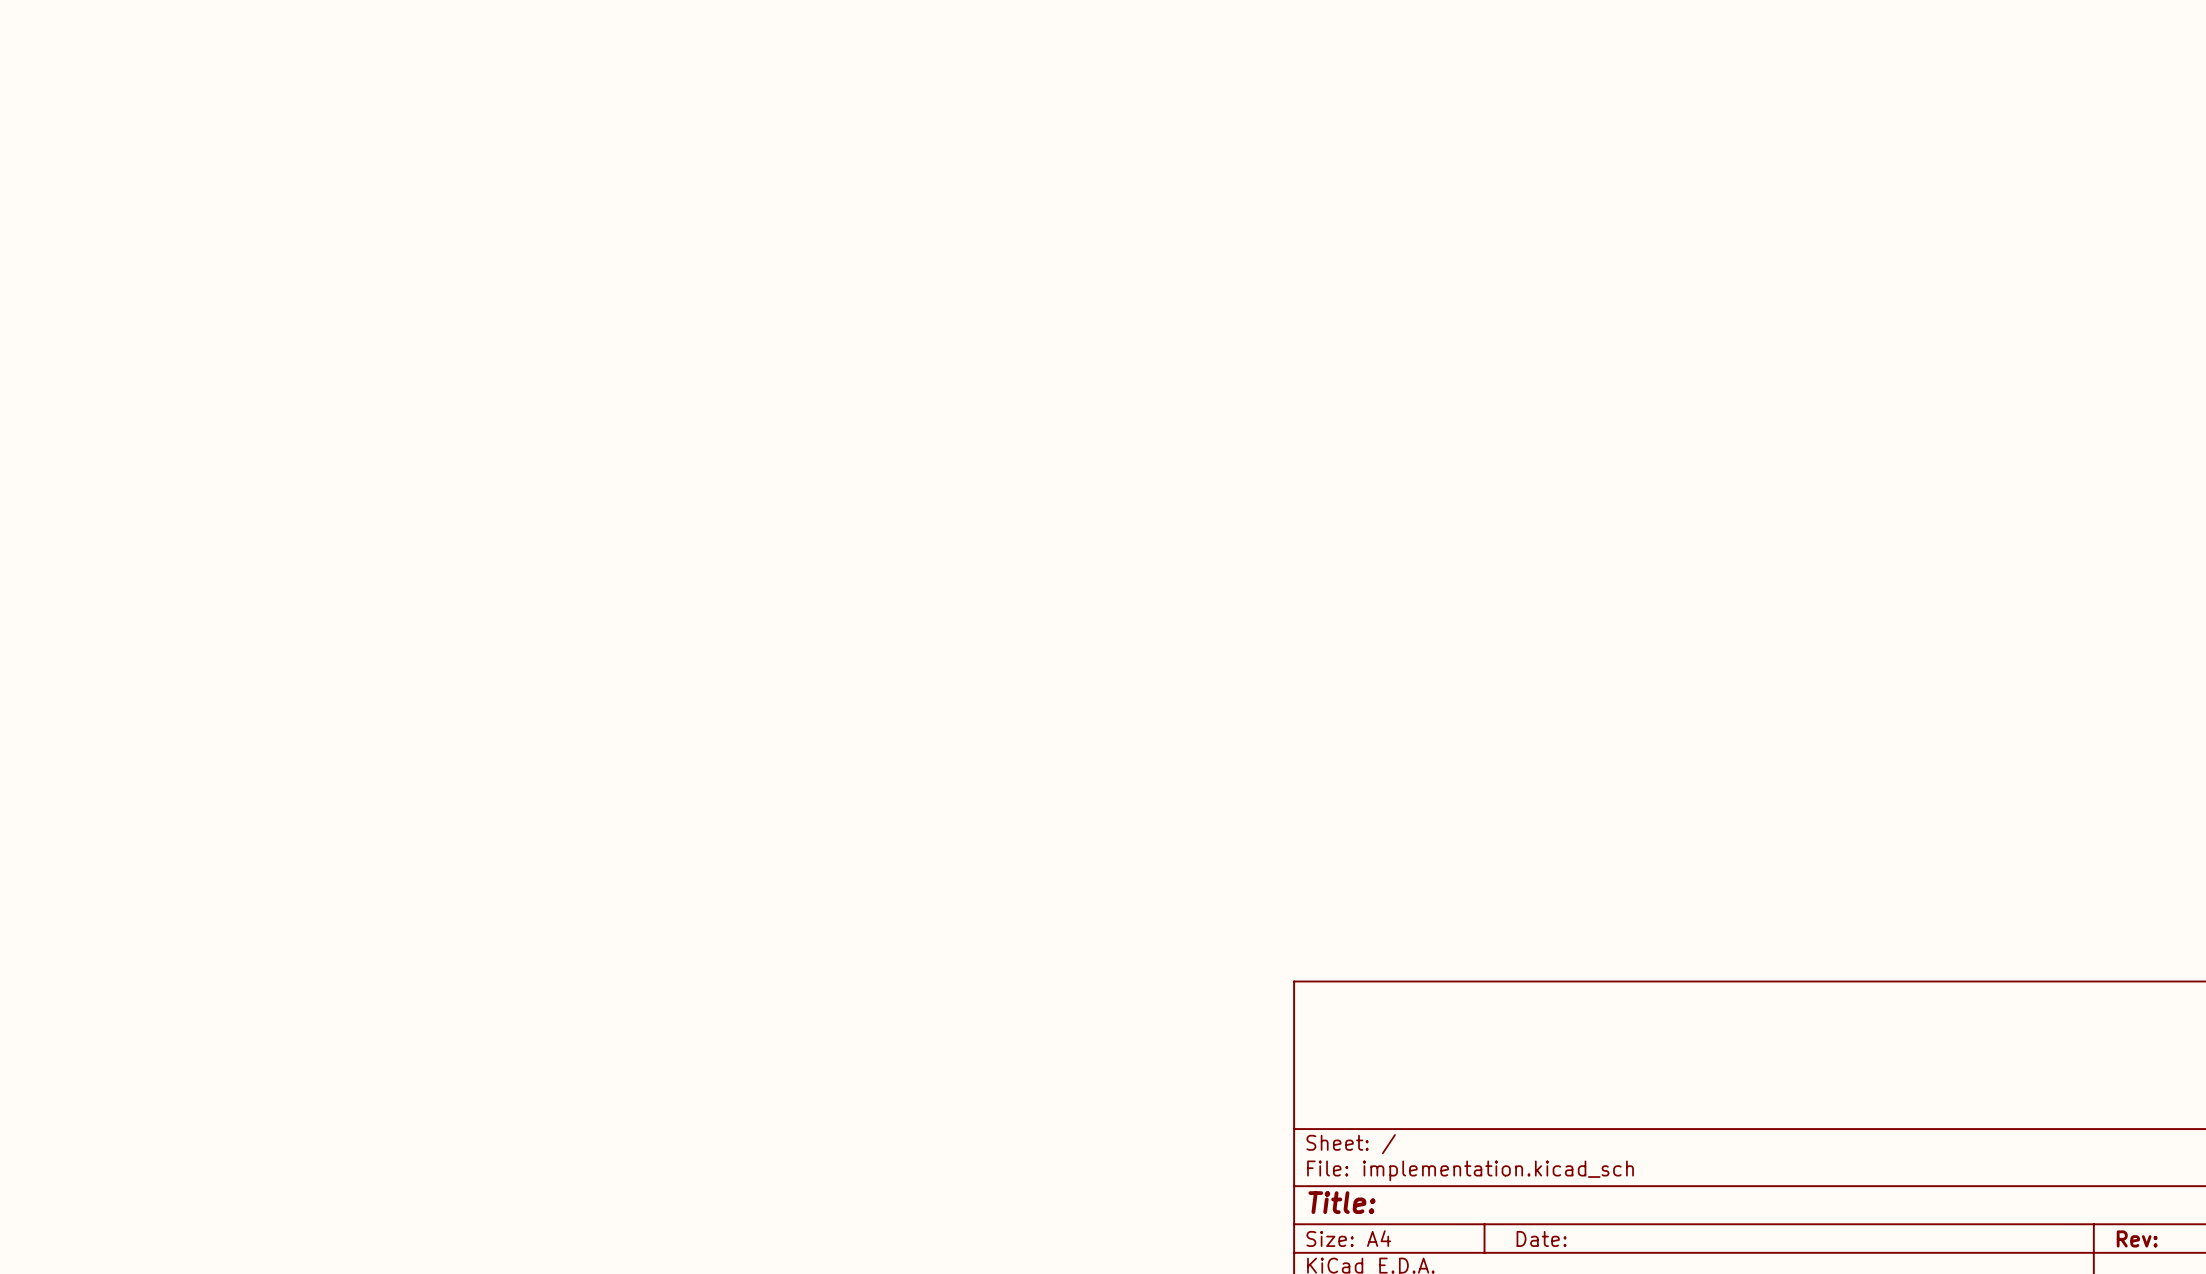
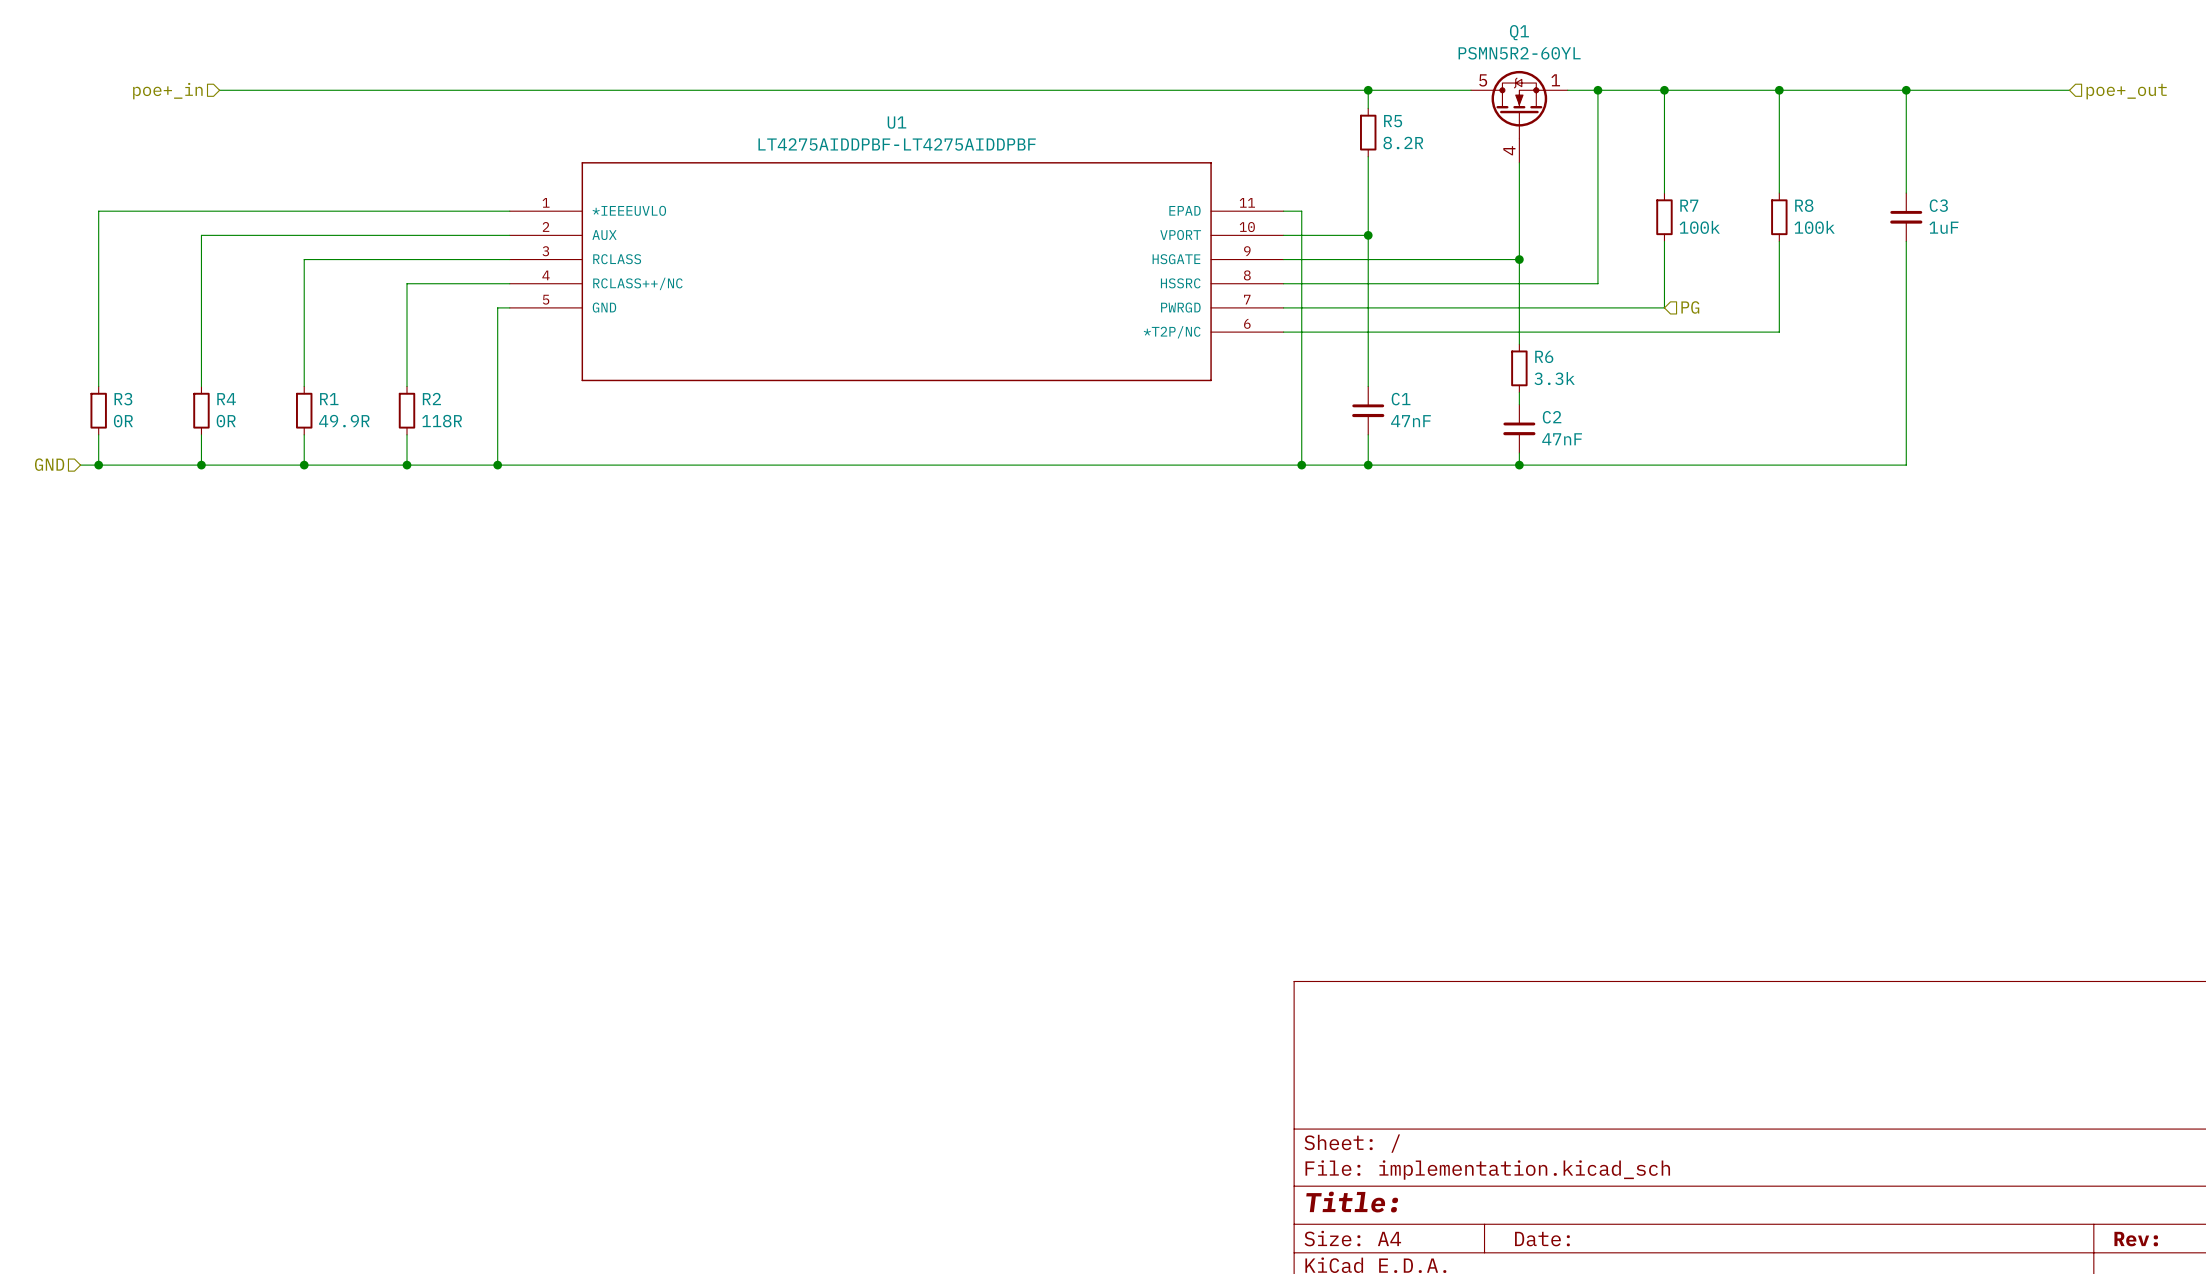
wire: none -> (219, 90) (1471, 90)
wire: none -> (1368, 90) (1368, 108)
junction: none -> (1368, 90)
wire: none -> (1567, 90) (2069, 90)
wire: none -> (1597, 90) (1597, 283) (1283, 283)
junction: none -> (1597, 90)
wire: none -> (1664, 90) (1664, 193)
junction: none -> (1664, 90)
wire: none -> (1779, 90) (1779, 193)
junction: none -> (1779, 90)
wire: none -> (1906, 90) (1906, 193)
junction: none -> (1906, 90)
hierarchical label: none -> poe+_in (167, 91)
hierarchical label: none -> poe+_out (2126, 91)
Q1: none -> PSMN5R2-60YL (1519, 116)
R5: none -> 8.2R (1368, 132)
wire: none -> (1368, 156) (1368, 386)
wire: none -> (1519, 162) (1519, 344)
wire: none -> (509, 211) (98, 211) (98, 386)
wire: none -> (1283, 211) (1301, 211) (1301, 465)
R7: none -> 100k (1664, 217)
R8: none -> 100k (1779, 217)
C3: none -> 1uF (1906, 217)
wire: none -> (509, 235) (201, 235) (201, 386)
wire: none -> (1283, 235) (1368, 235)
junction: none -> (1368, 235)
wire: none -> (1664, 241) (1664, 307) (1283, 307)
wire: none -> (1779, 241) (1779, 332) (1283, 332)
wire: none -> (1906, 241) (1906, 465) (80, 465)
wire: none -> (509, 259) (304, 259) (304, 386)
wire: none -> (1283, 259) (1519, 259)
junction: none -> (1519, 259)
U1: none -> LT4275AIDDPBF-LT4275AIDDPBF (896, 271)
wire: none -> (509, 283) (407, 283) (407, 386)
wire: none -> (509, 307) (497, 307) (497, 465)
hierarchical label: none -> PG (1690, 307)
R6: none -> 3.3k (1519, 368)
wire: none -> (1519, 392) (1519, 404)
R3: none -> 0R (98, 410)
R4: none -> 0R (201, 410)
R1: none -> 49.9R (304, 410)
R2: none -> 118R (407, 410)
C1: none -> 47nF (1368, 410)
C2: none -> 47nF (1519, 428)
wire: none -> (98, 434) (98, 465)
wire: none -> (201, 434) (201, 465)
wire: none -> (304, 434) (304, 465)
wire: none -> (407, 434) (407, 465)
wire: none -> (1368, 434) (1368, 465)
wire: none -> (1519, 453) (1519, 465)
hierarchical label: none -> GND (49, 464)
junction: none -> (98, 465)
junction: none -> (201, 465)
junction: none -> (304, 465)
junction: none -> (407, 465)
junction: none -> (497, 465)
junction: none -> (1301, 465)
junction: none -> (1368, 465)
junction: none -> (1519, 465)

